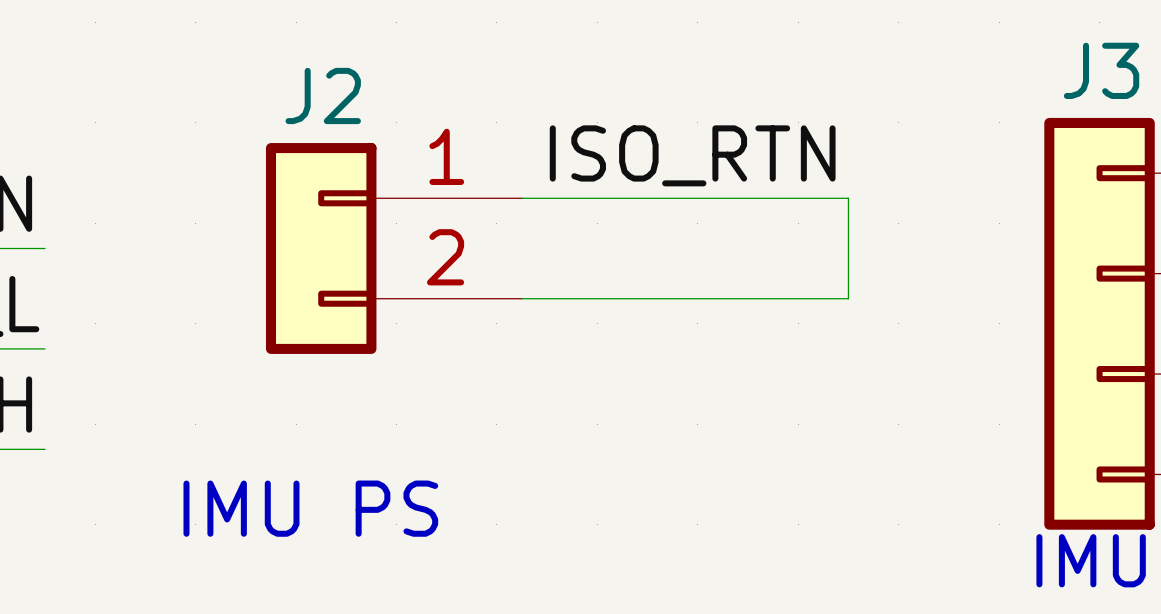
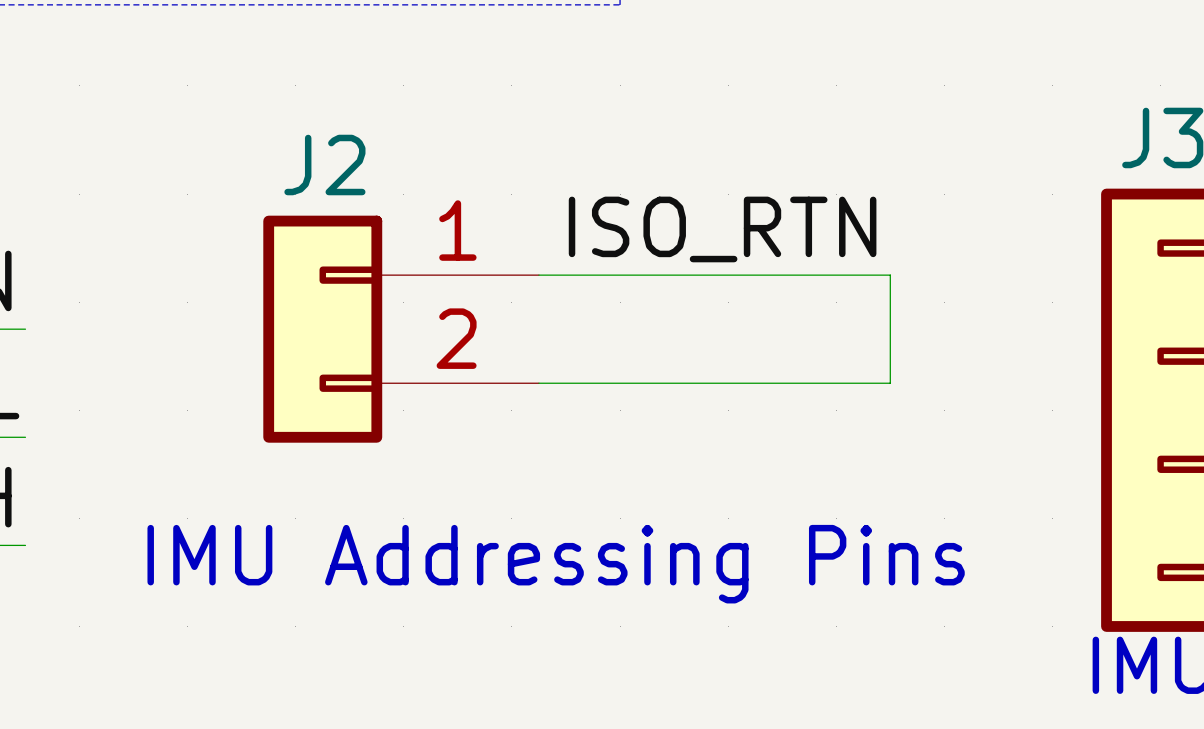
text: none -> IMU Addressing Pins (556, 564)
text: IMU PS (310, 508) -> none

